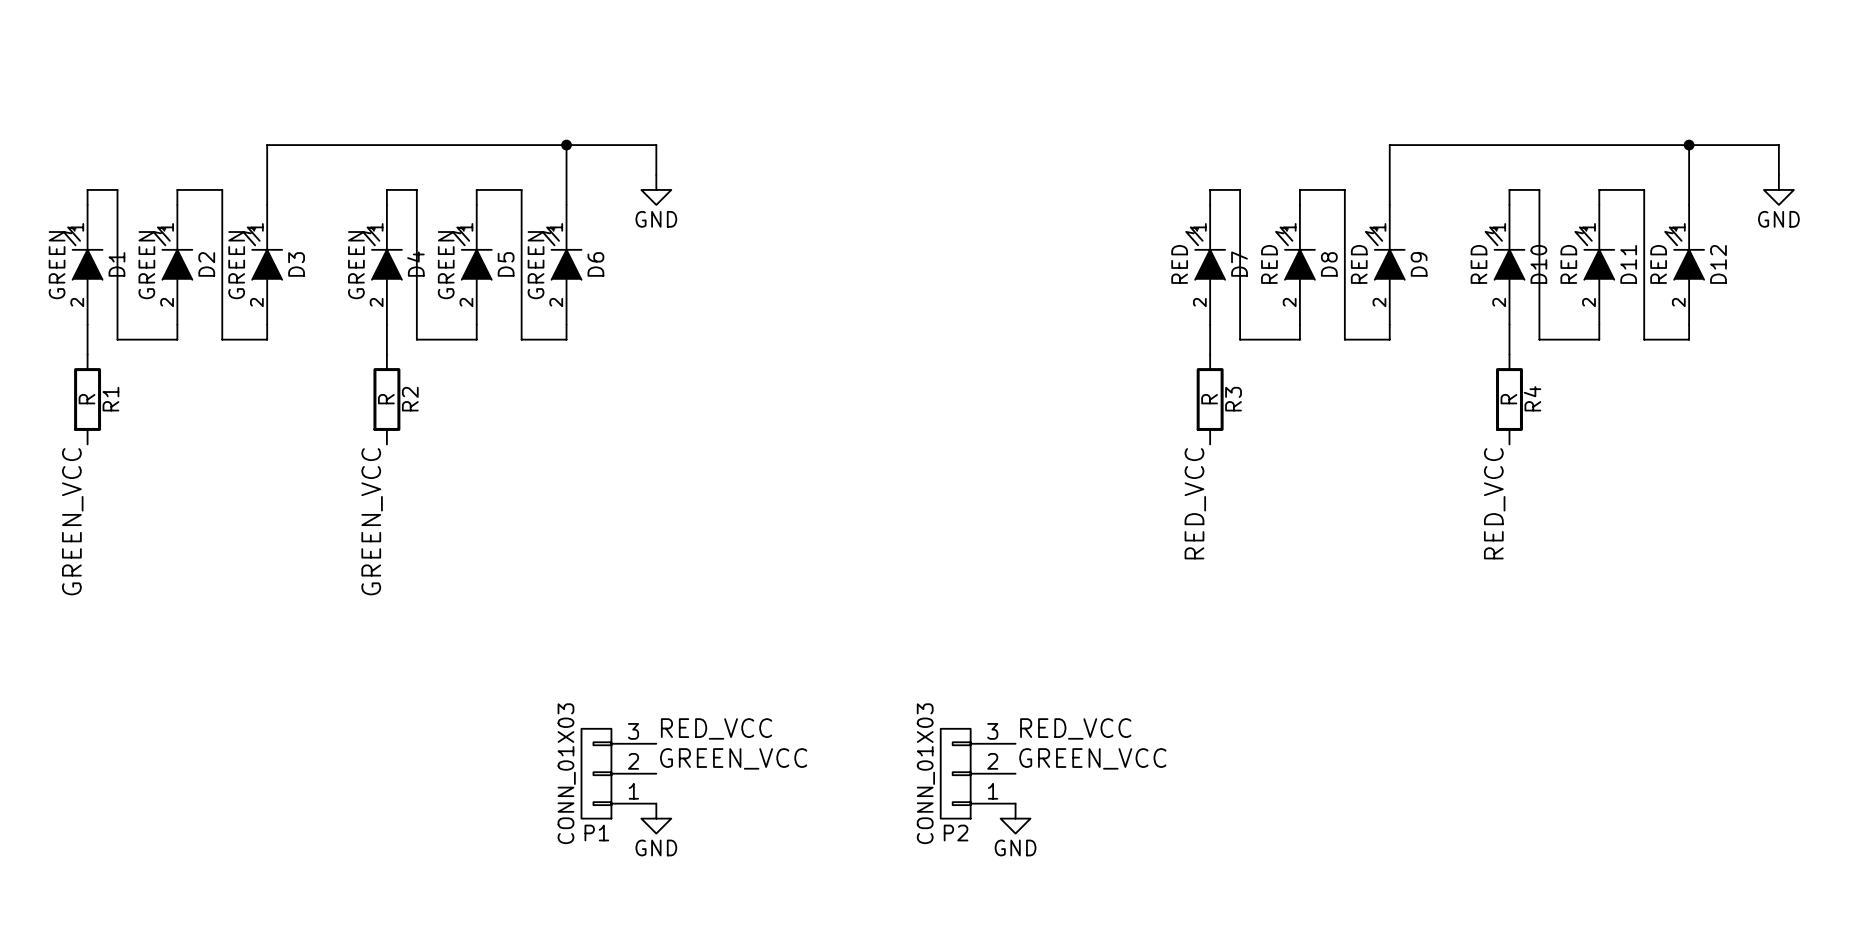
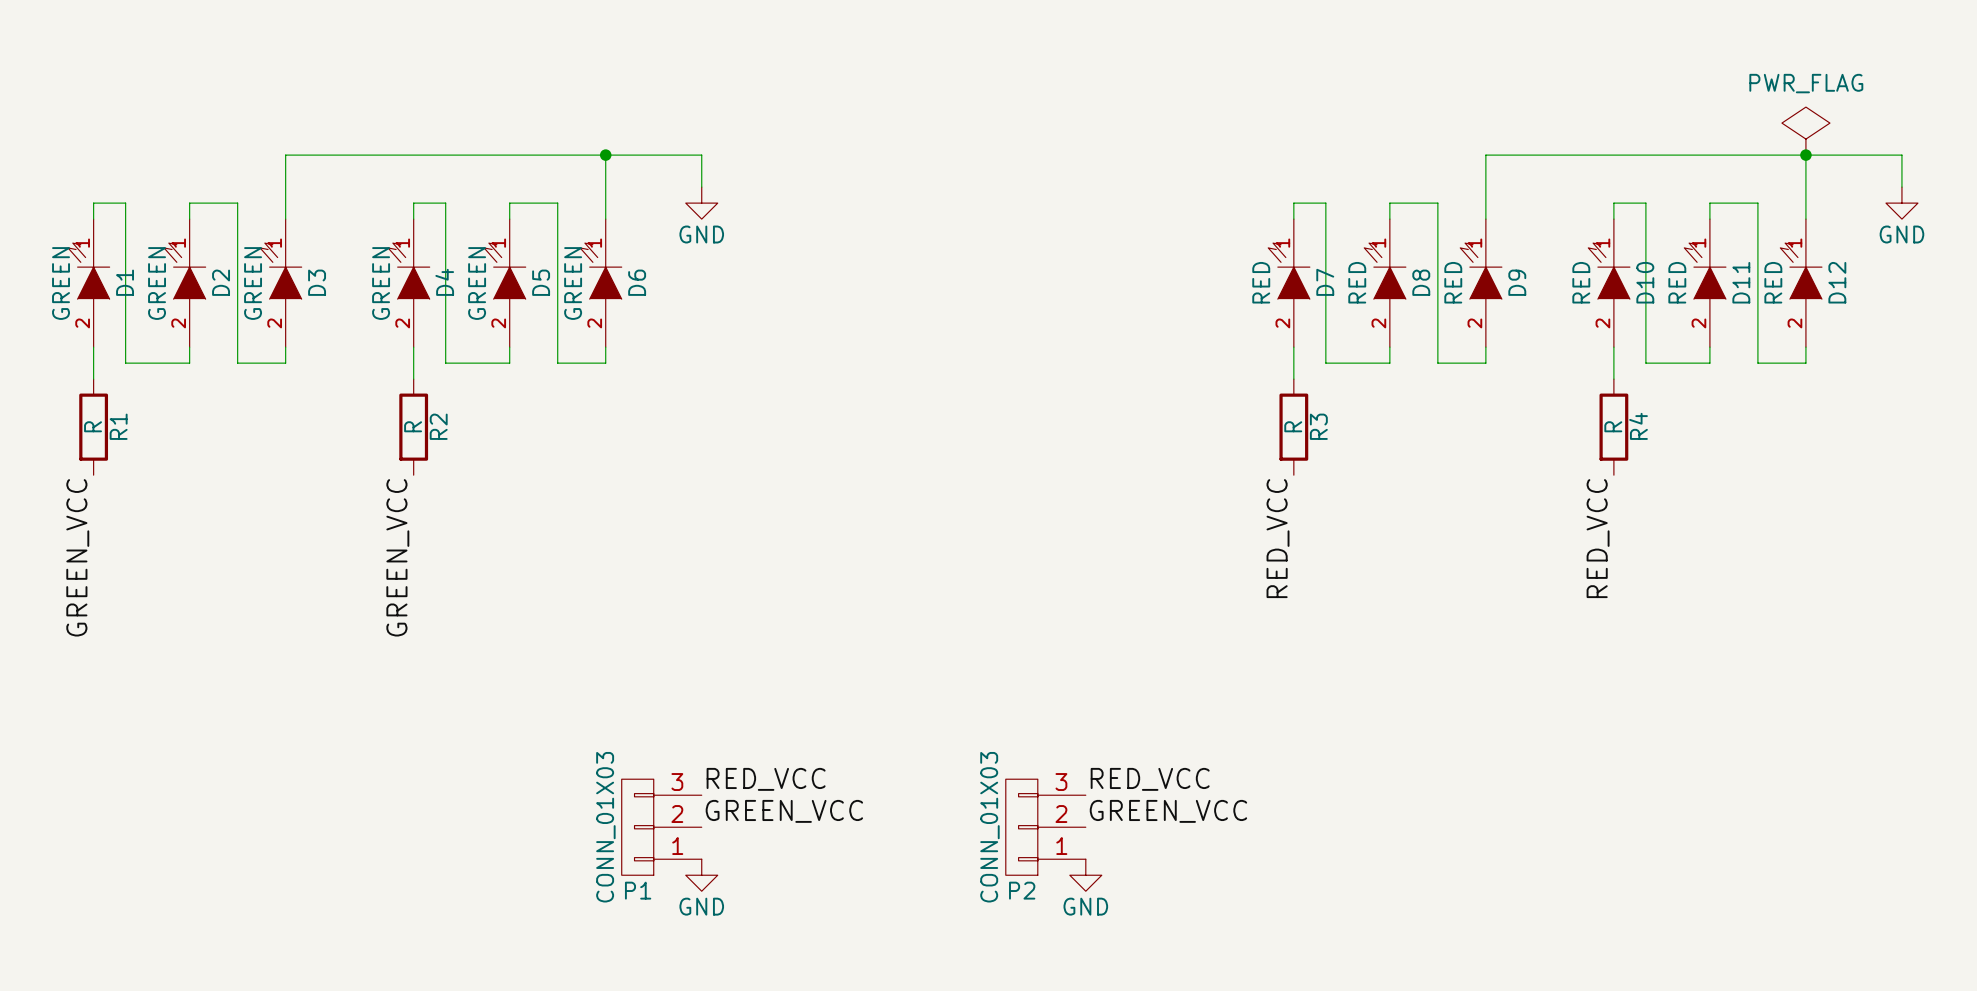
power symbol: none -> PWR_FLAG (1805, 131)

